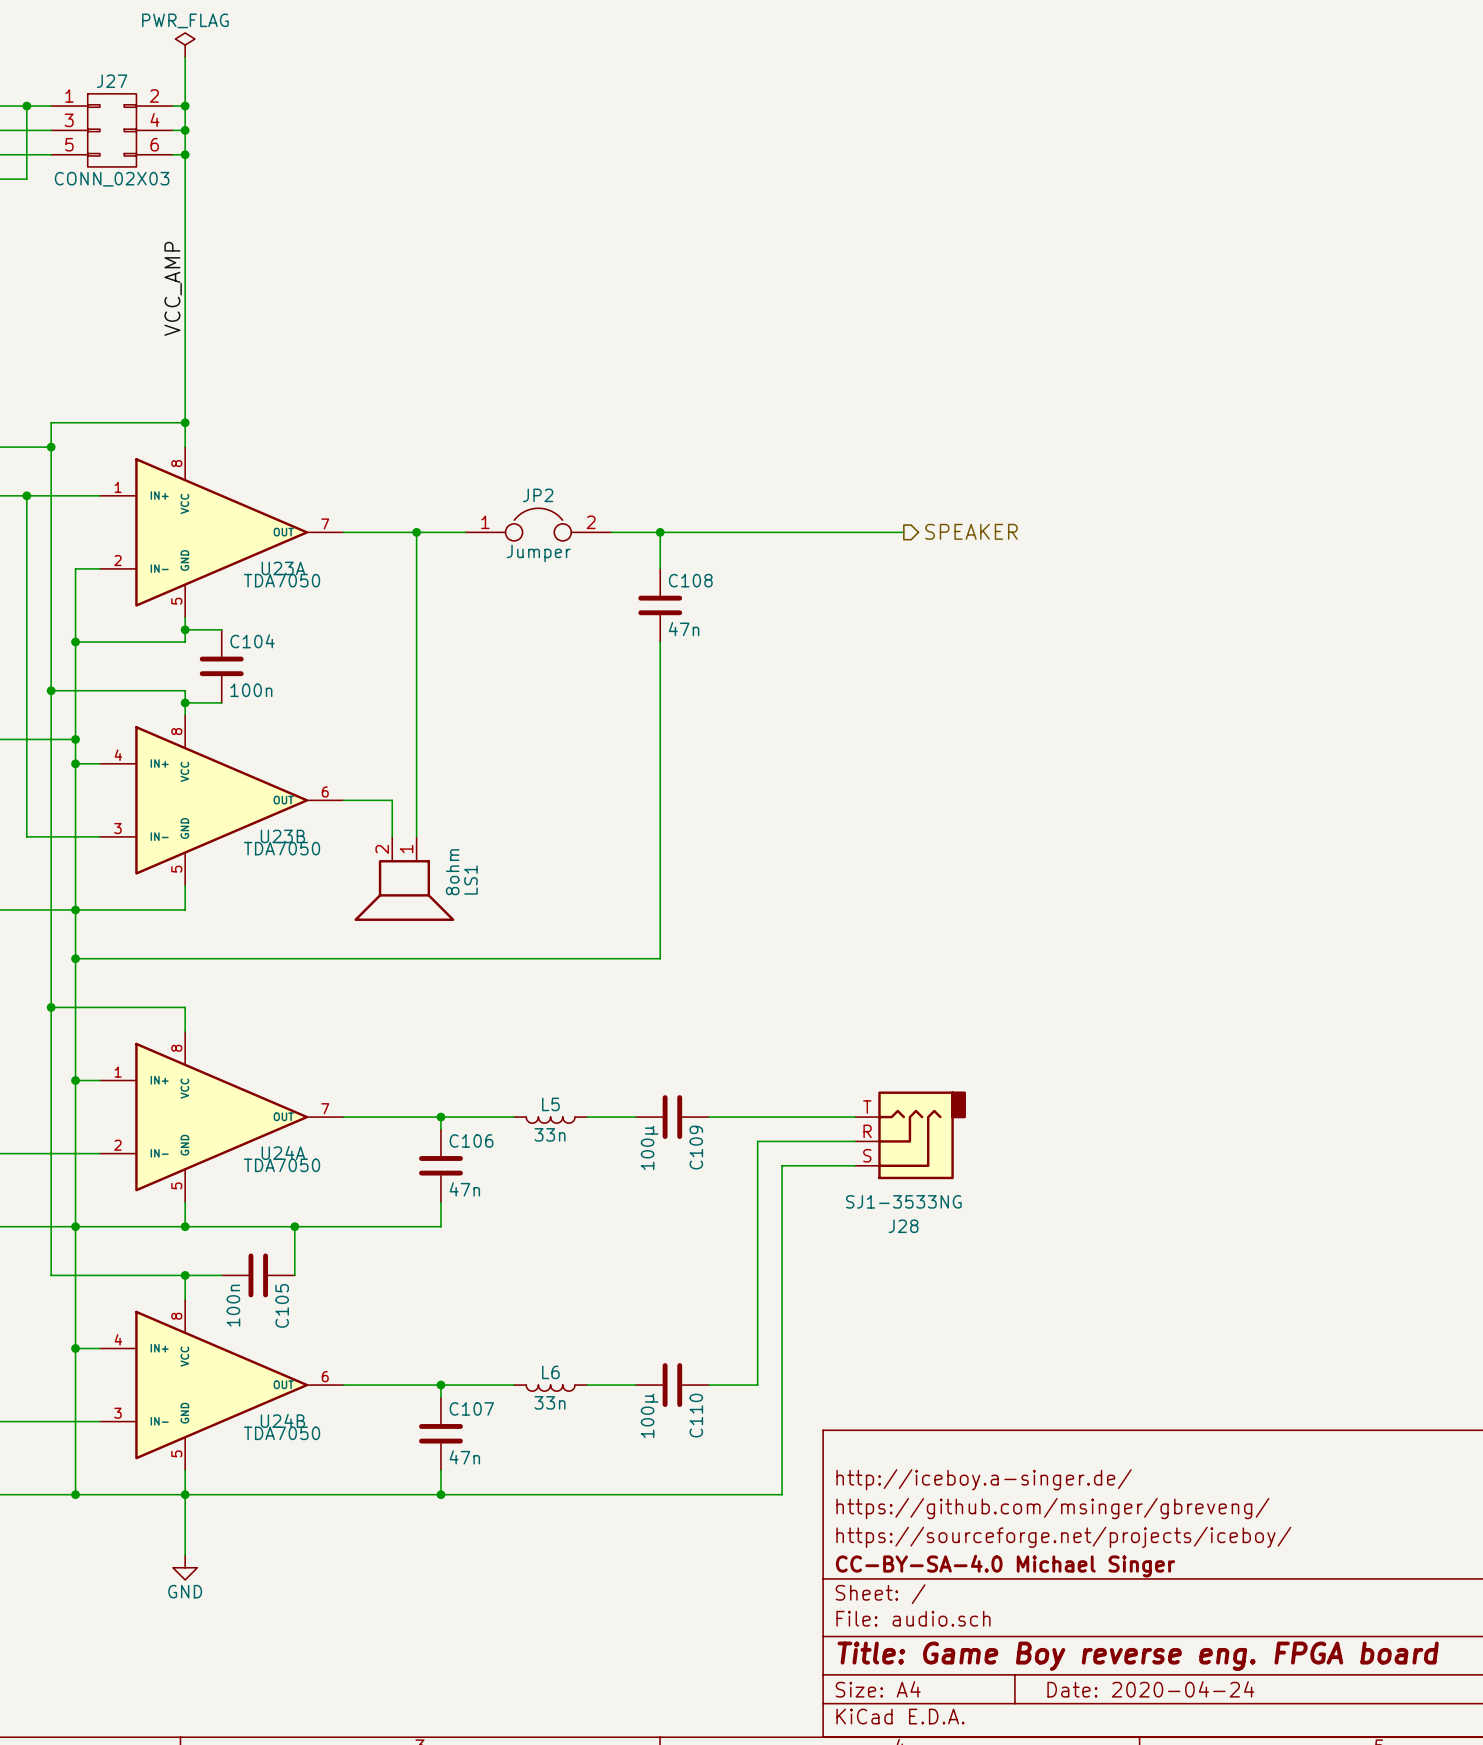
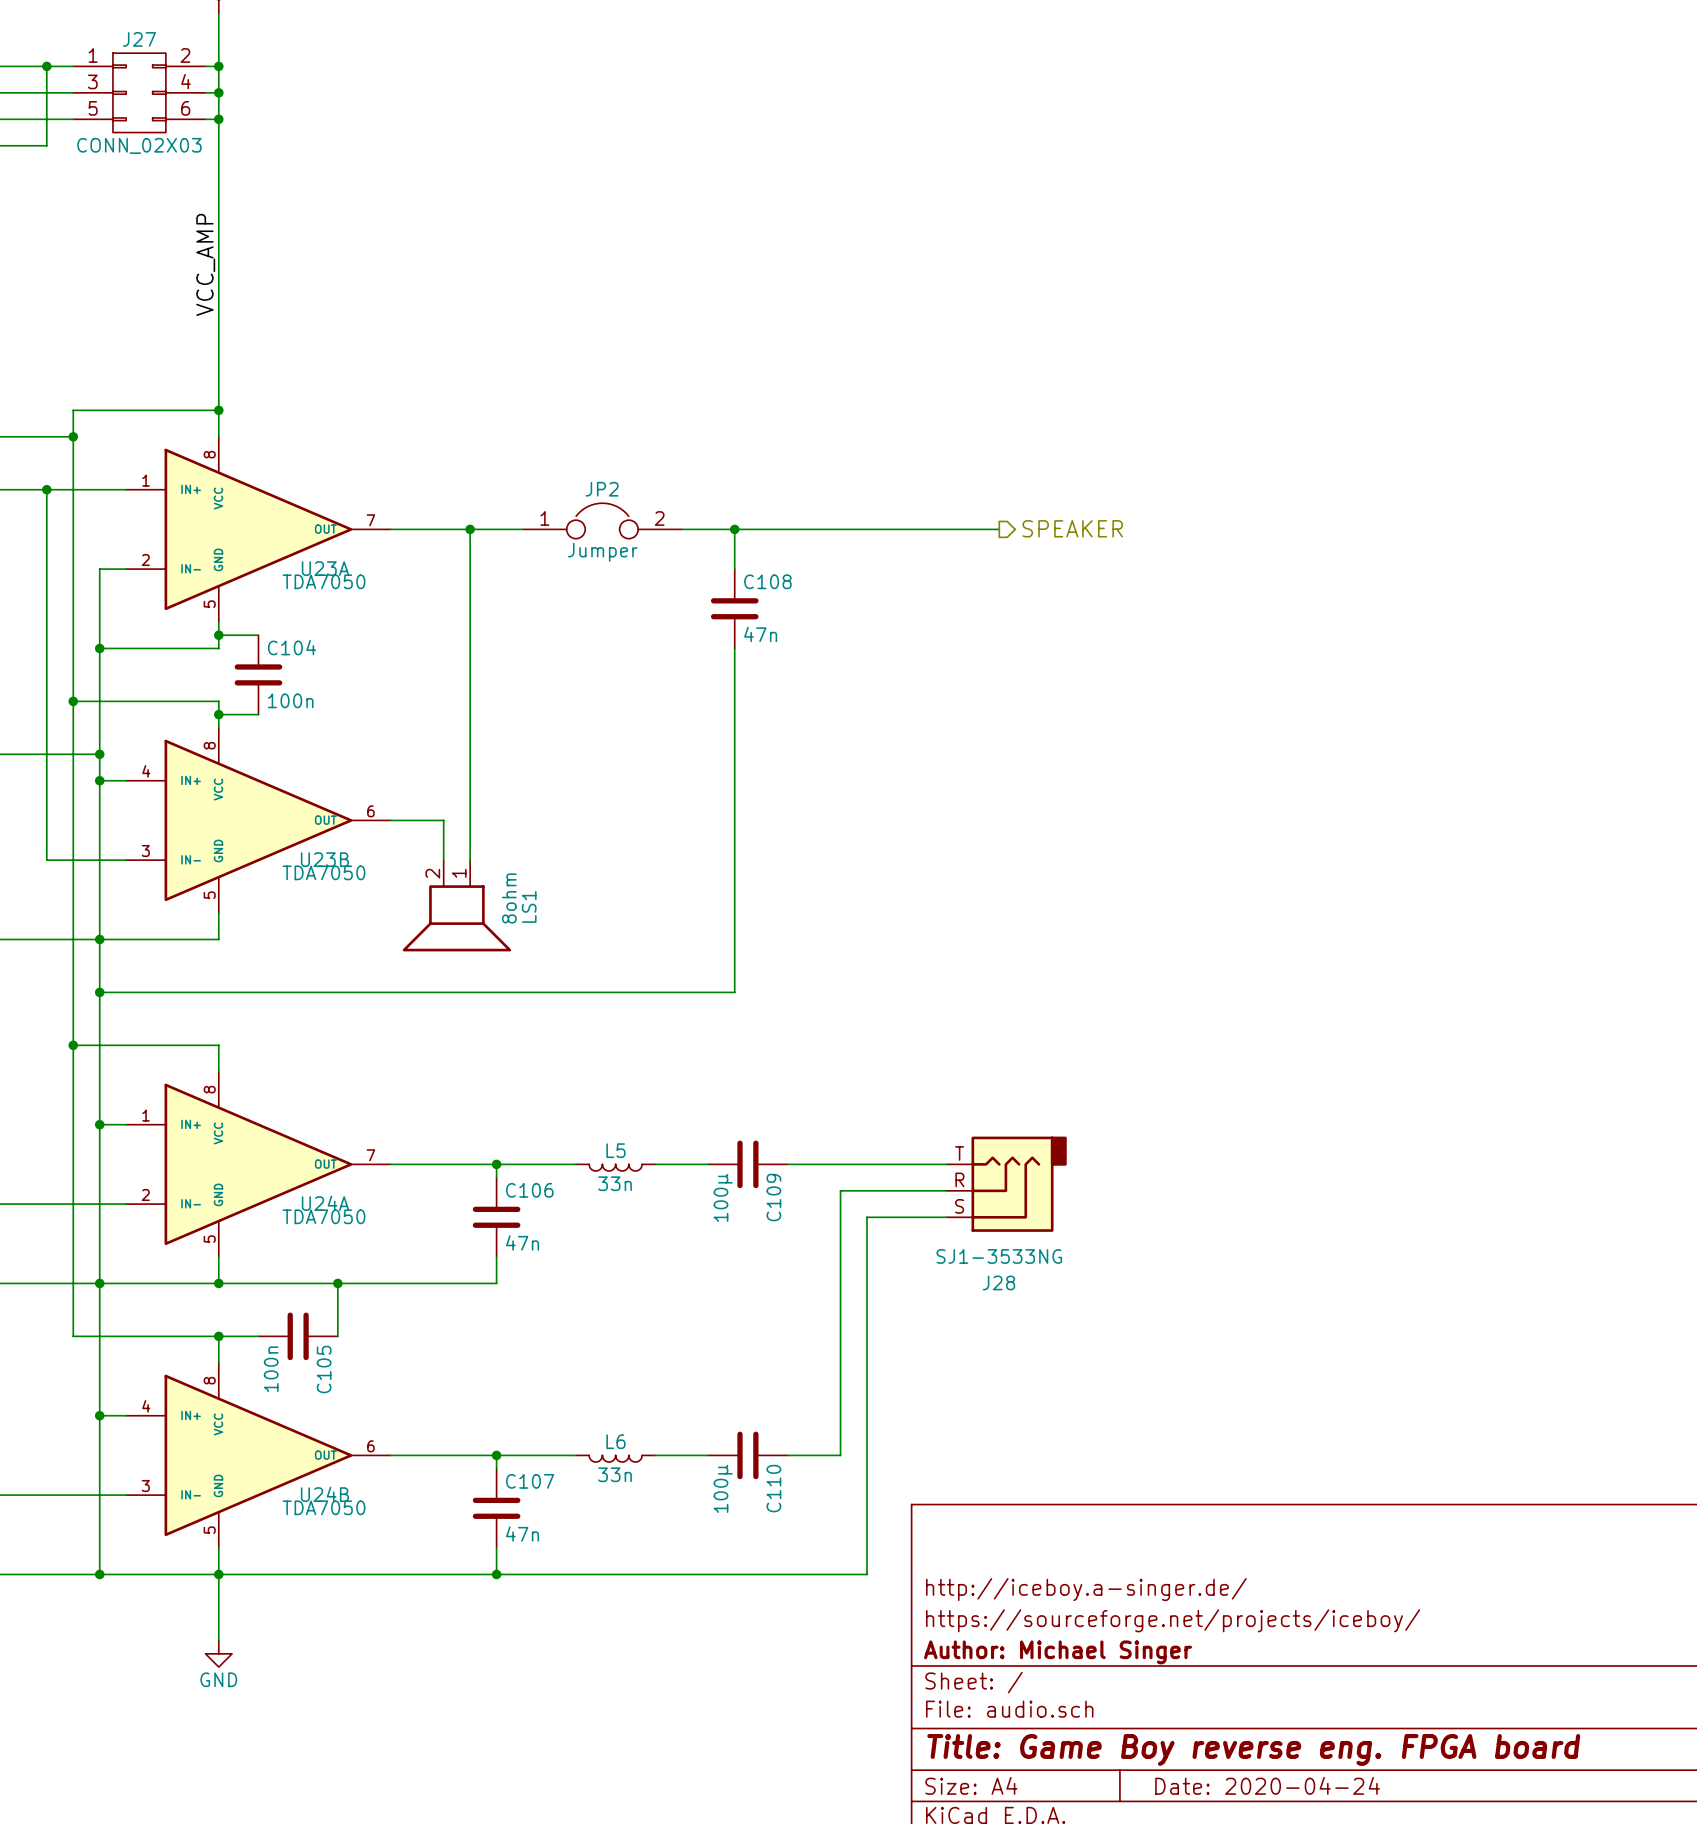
title block: http://iceboy.a-singer.de/ (984, 1479) -> none
title block: https://github.com/msinger/gbreveng/ (1052, 1508) -> http://iceboy.a-singer.de/ (1086, 1589)
title block: CC-BY-SA-4.0 Michael Singer (1005, 1566) -> Author: Michael Singer (1058, 1652)

